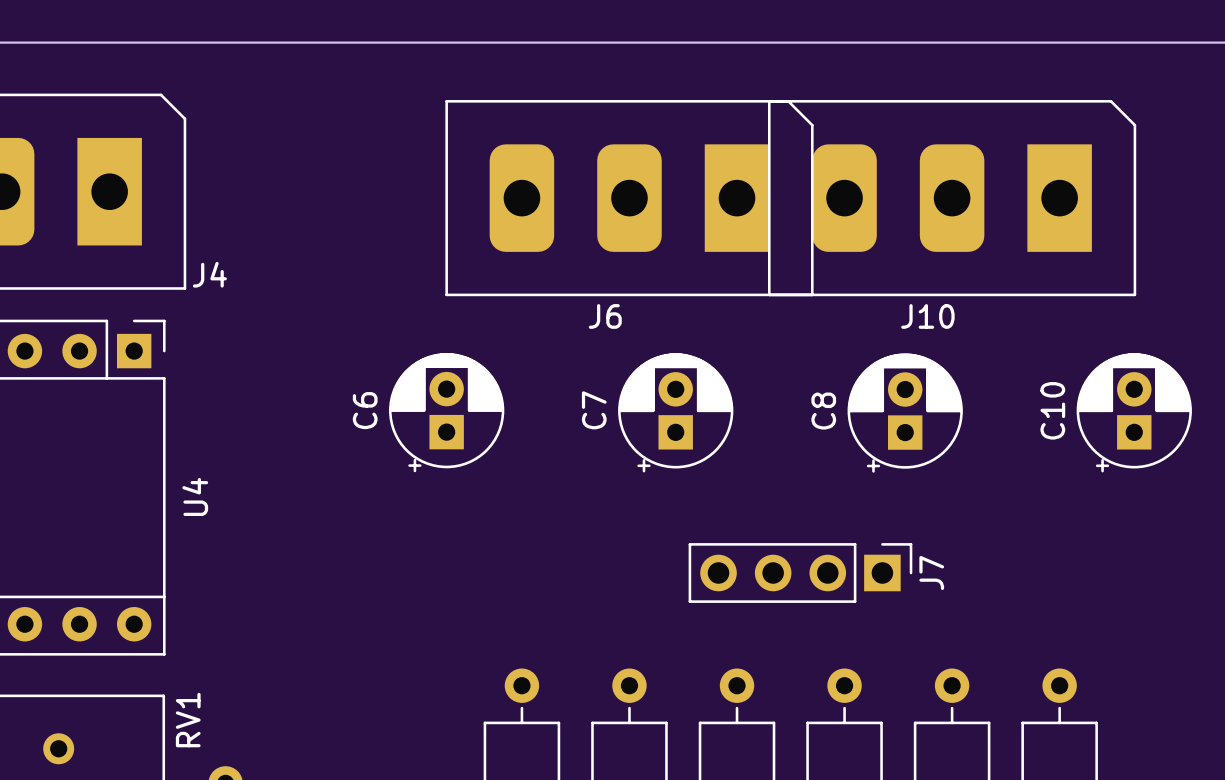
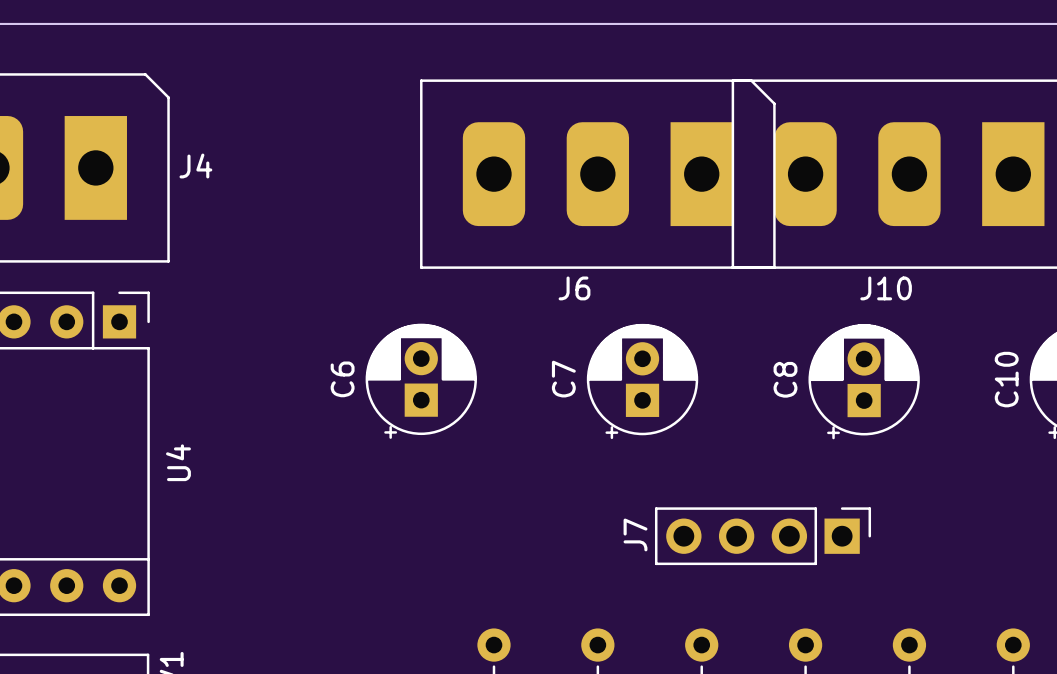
J4 name position: J4 (209, 274) -> J4 (195, 166)
J7 name position: J7 (931, 573) -> J7 (635, 534)

